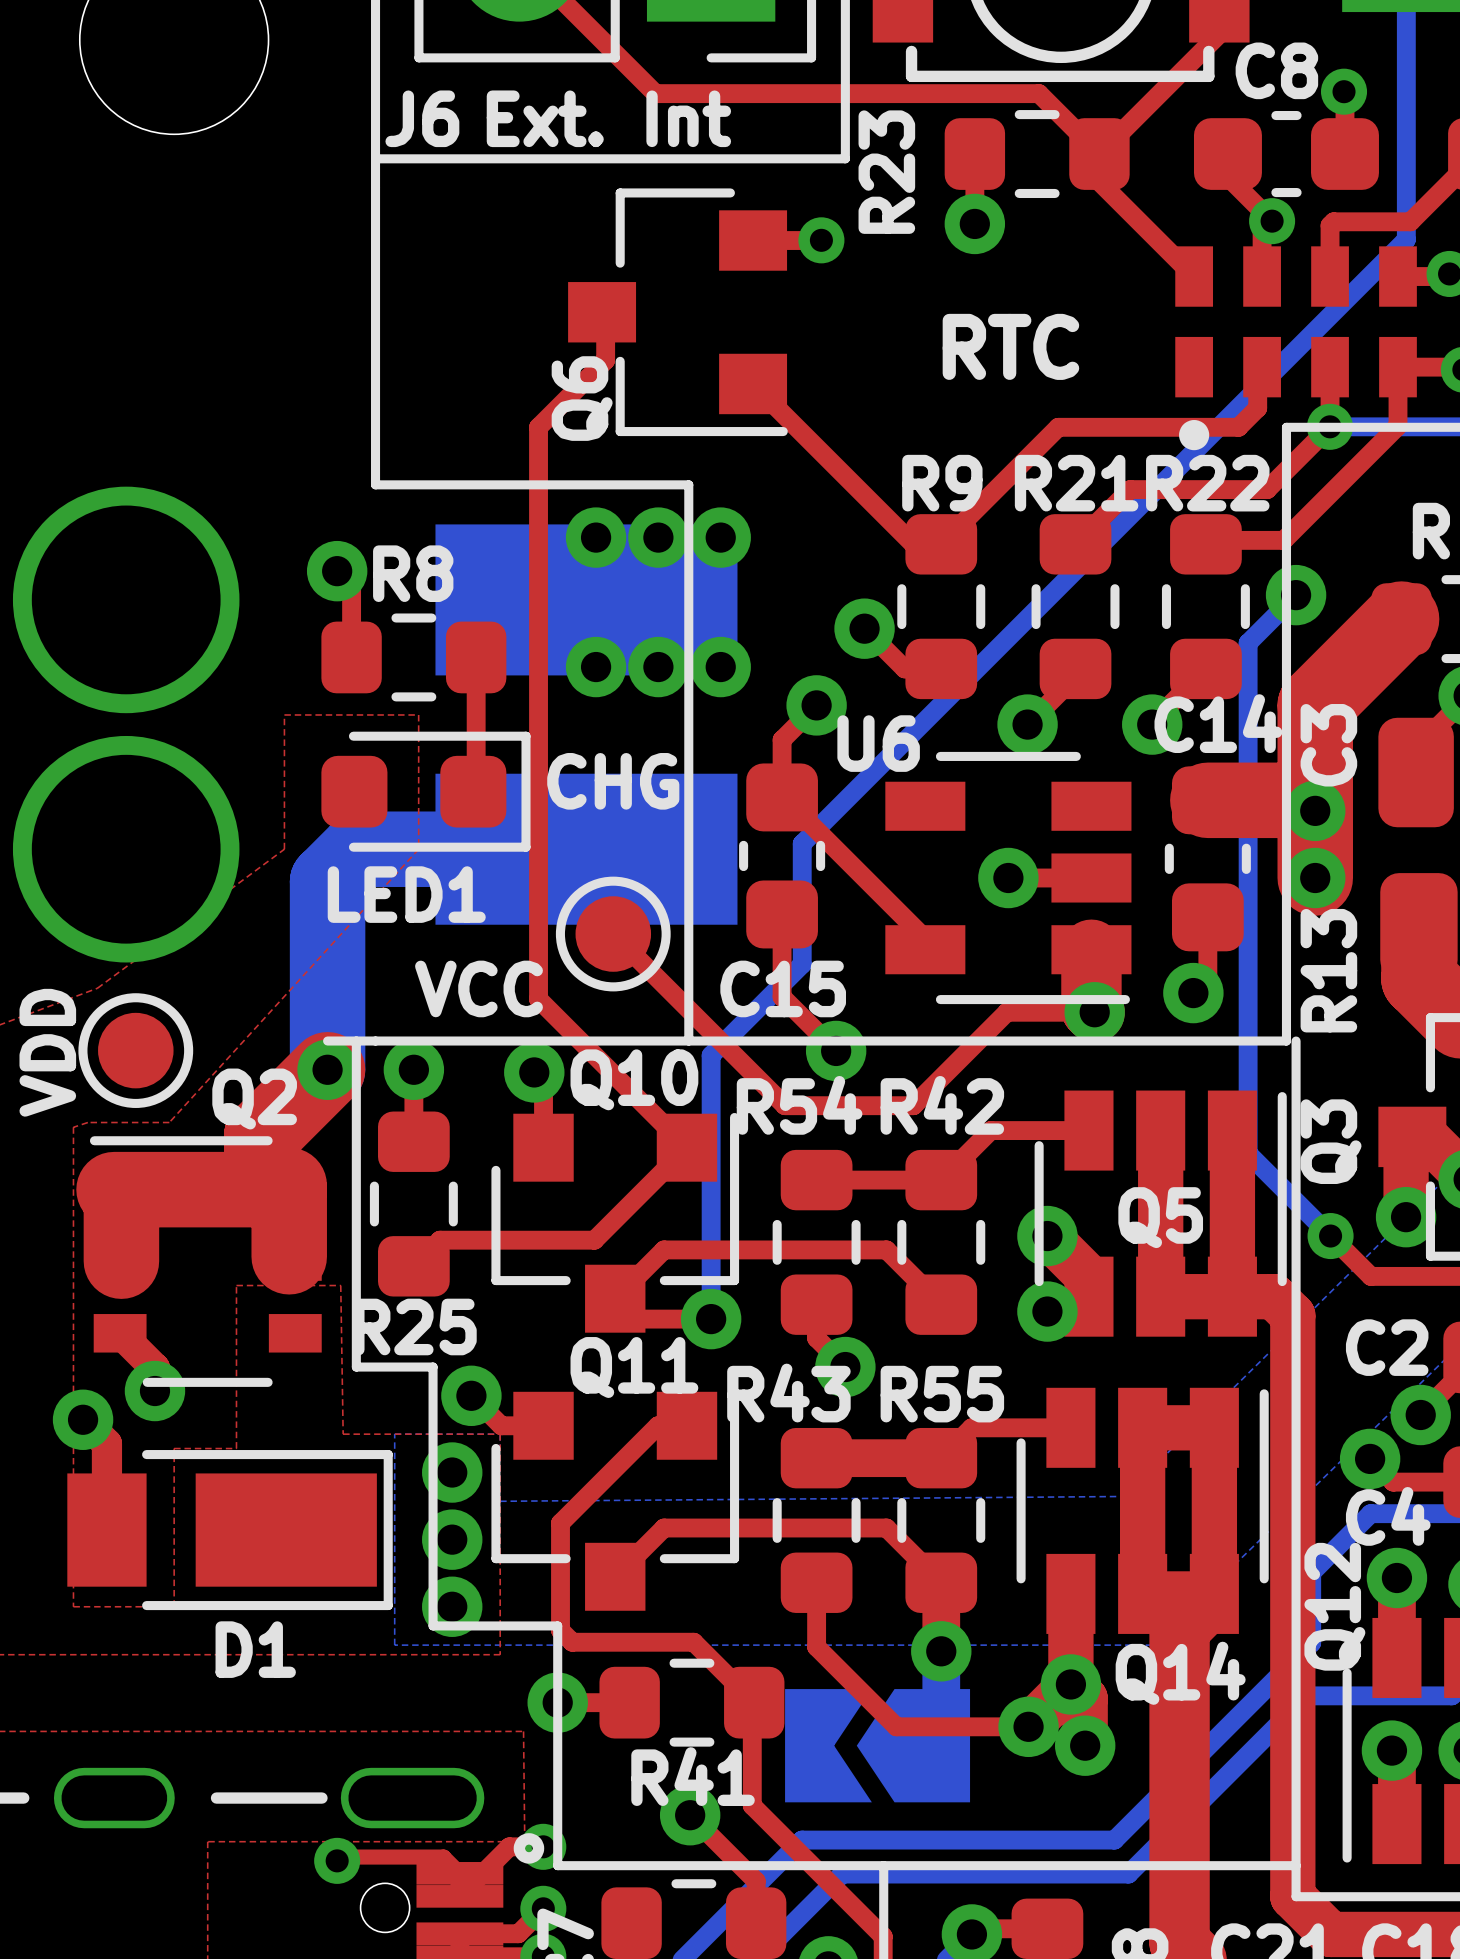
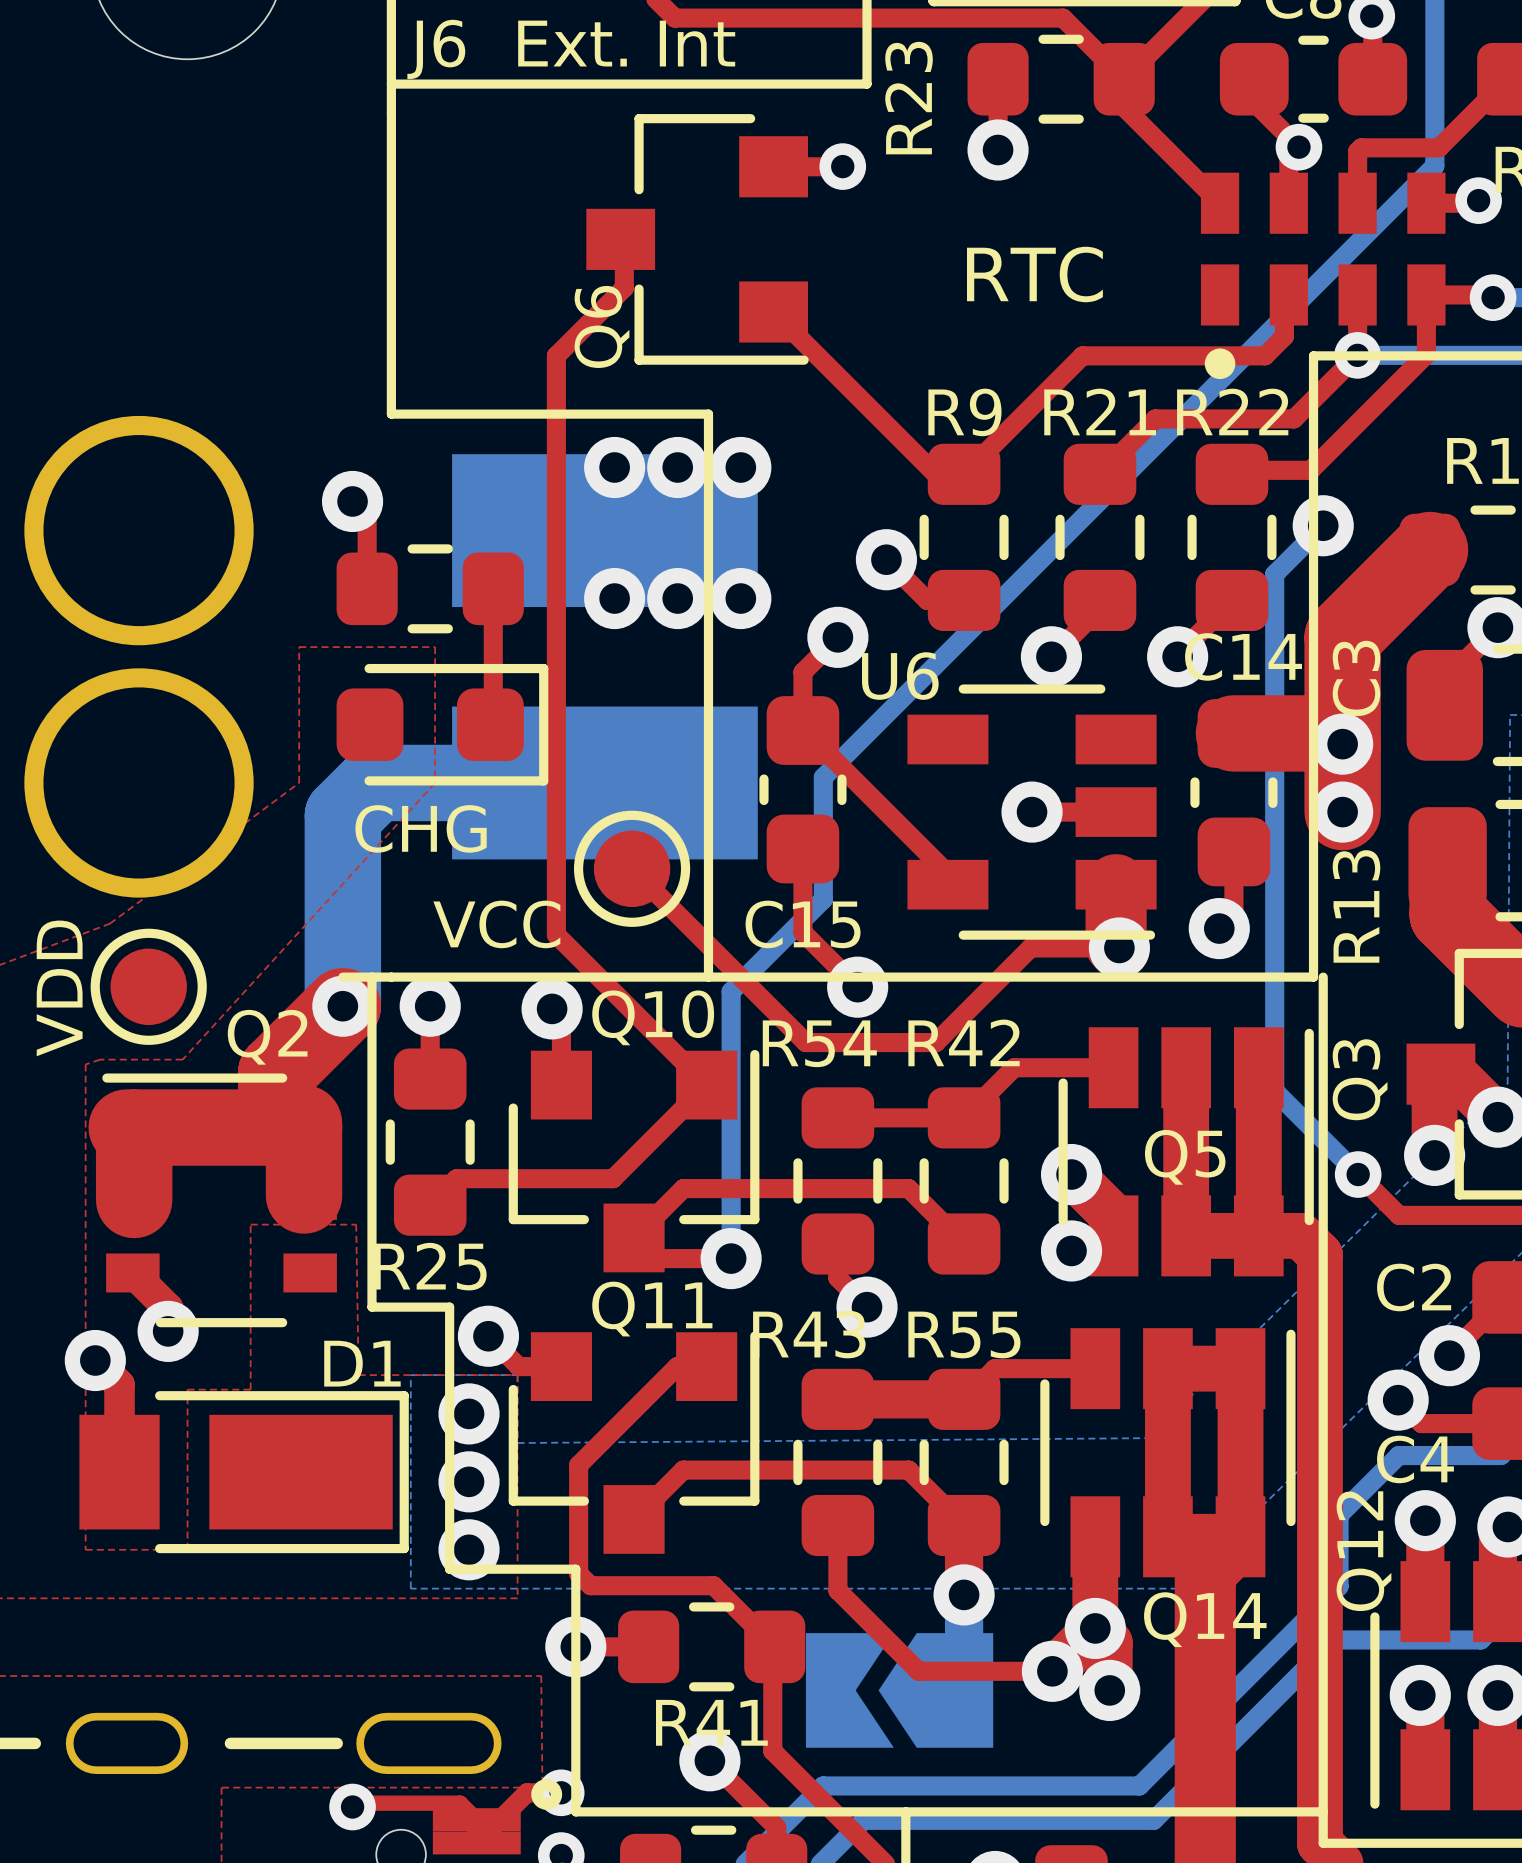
R8 name: R8 (413, 573) -> none
text position: CHG (613, 781) -> CHG (421, 828)
LED1 name: LED1 (406, 894) -> none
D1 name position: D1 (255, 1649) -> D1 (362, 1363)

